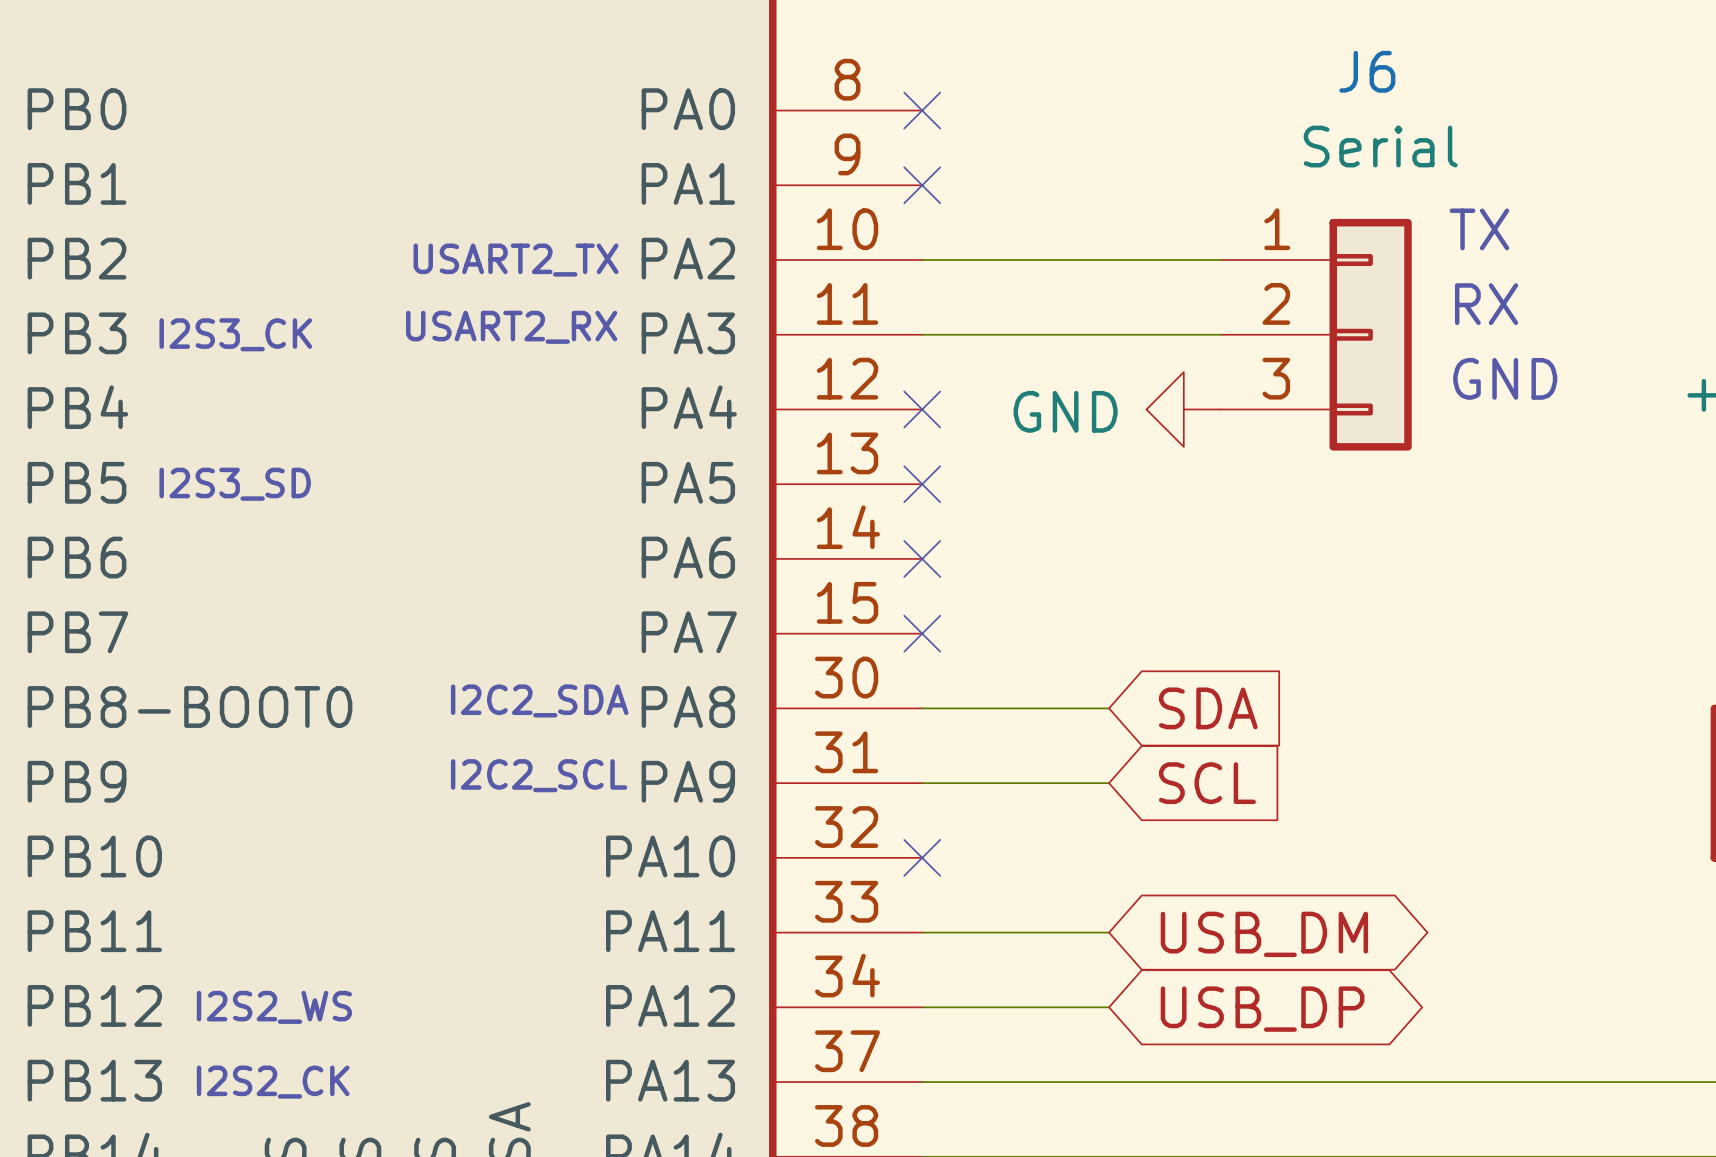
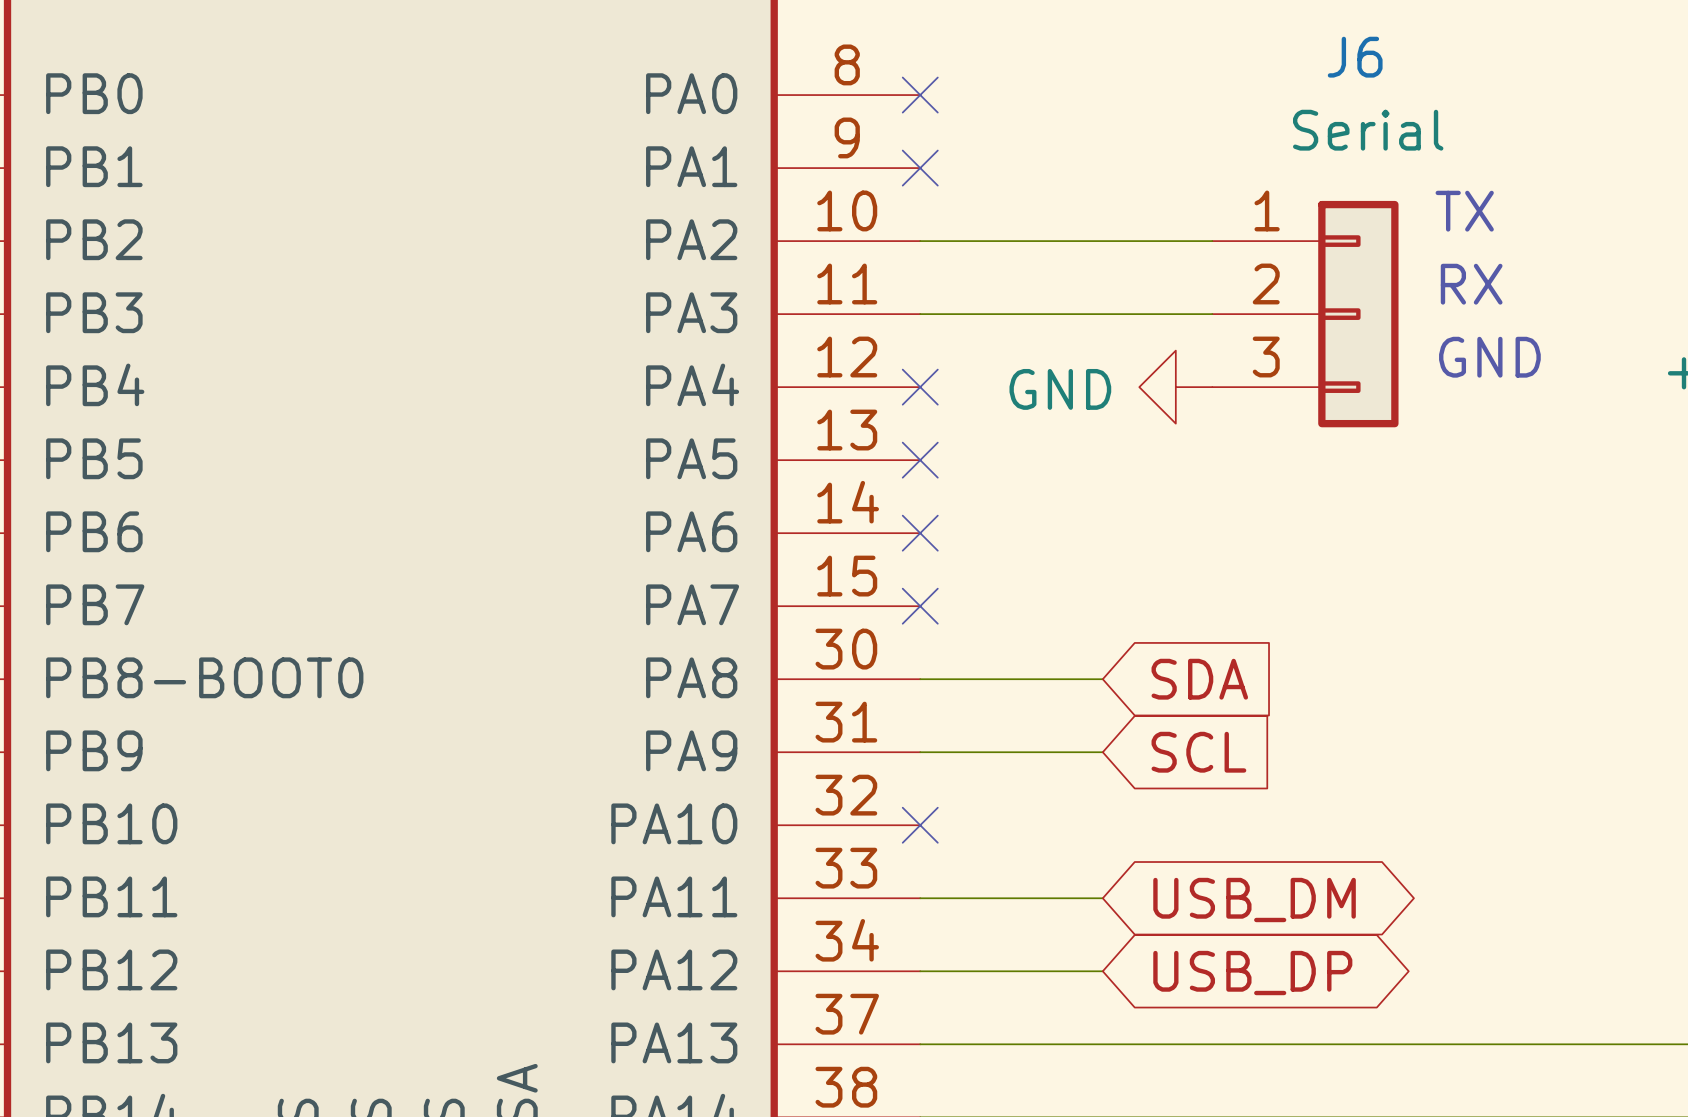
text: USART2_TX (516, 260) -> none
text: USART2_RX (511, 327) -> none
text: I2S3_CK (235, 334) -> none
text: I2S3_SD (235, 484) -> none
text: I2C2_SDA (539, 700) -> none
text: I2C2_SCL (539, 775) -> none
text: I2S2_WS (274, 1007) -> none
text: I2S2_CK (273, 1082) -> none

